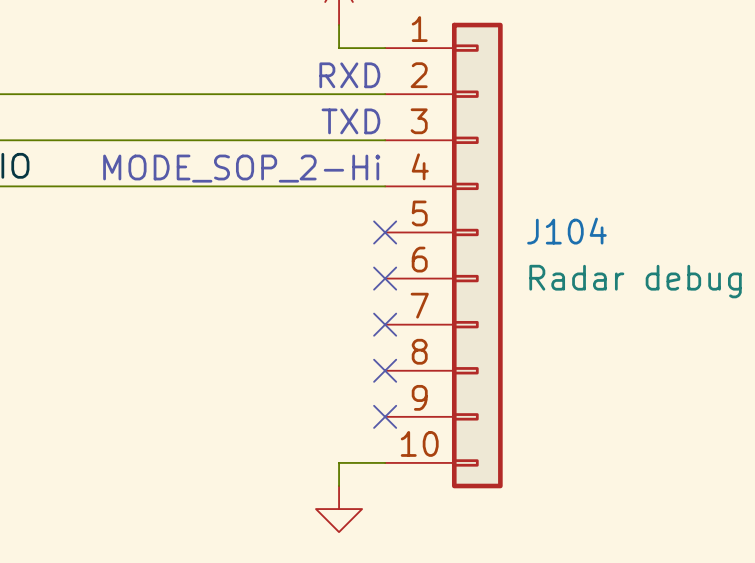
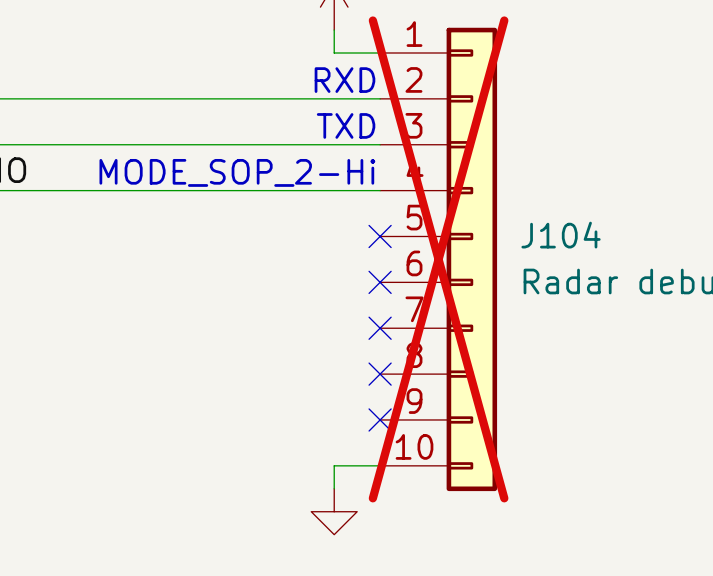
J104 do-not-place cross: none -> (438, 259)

